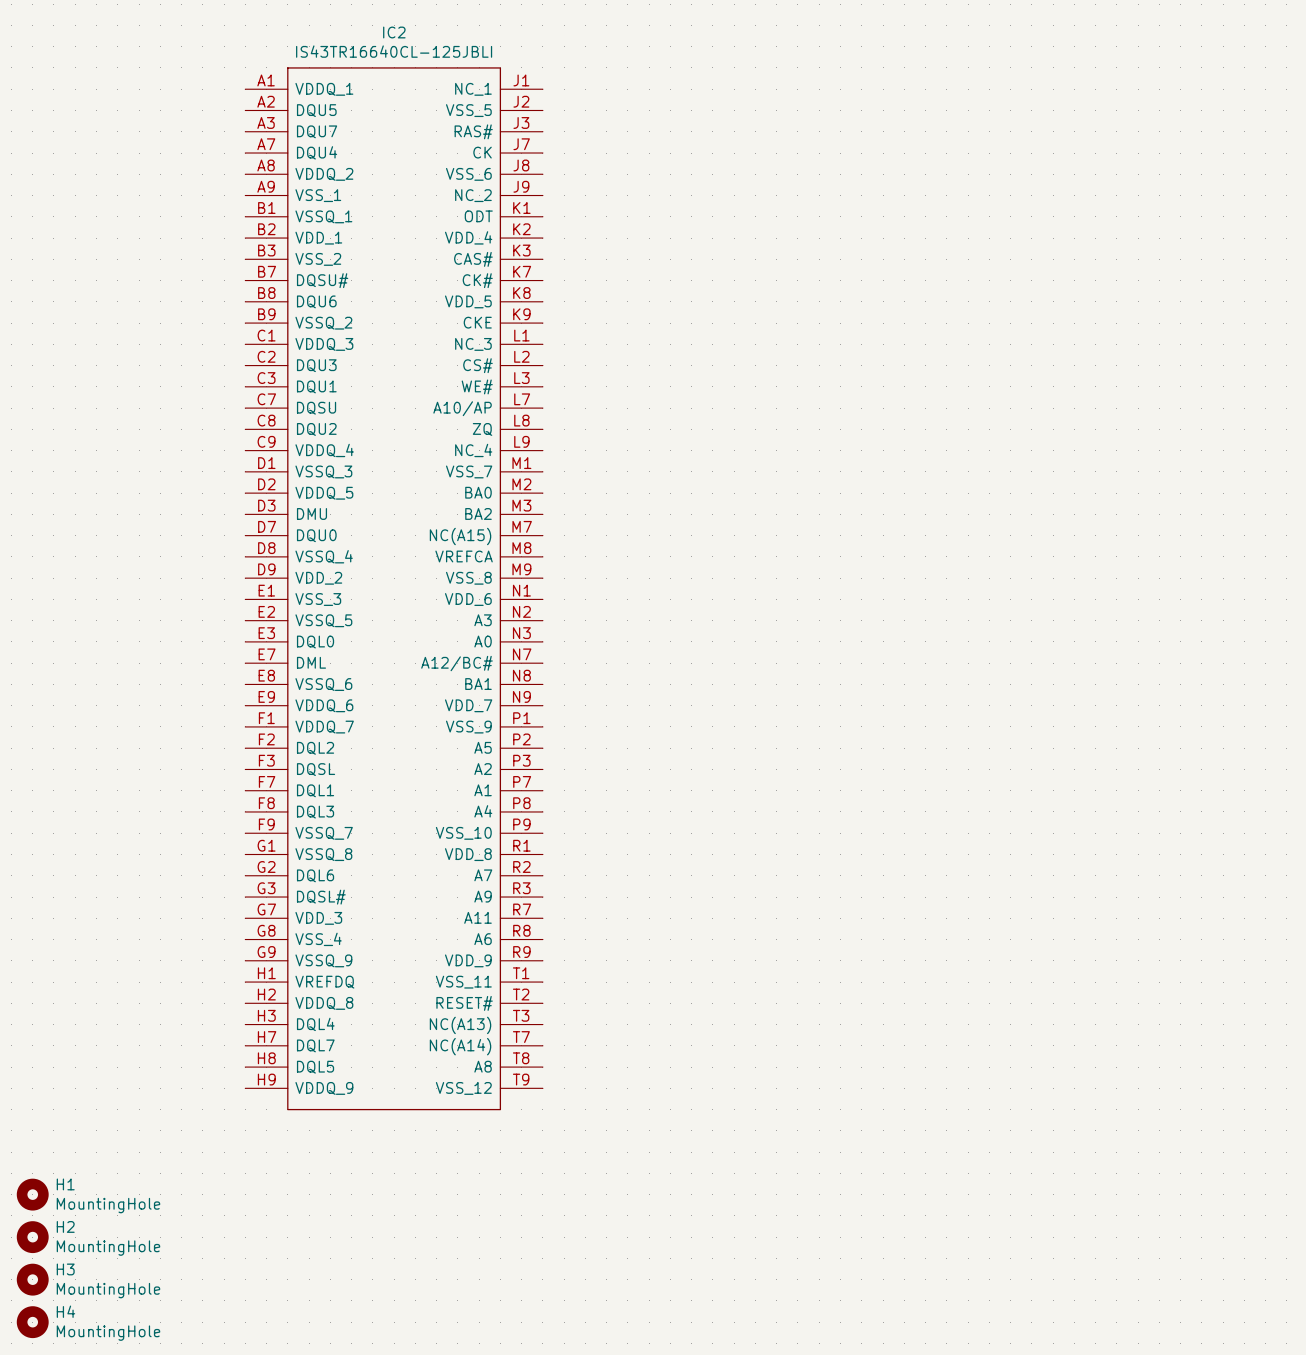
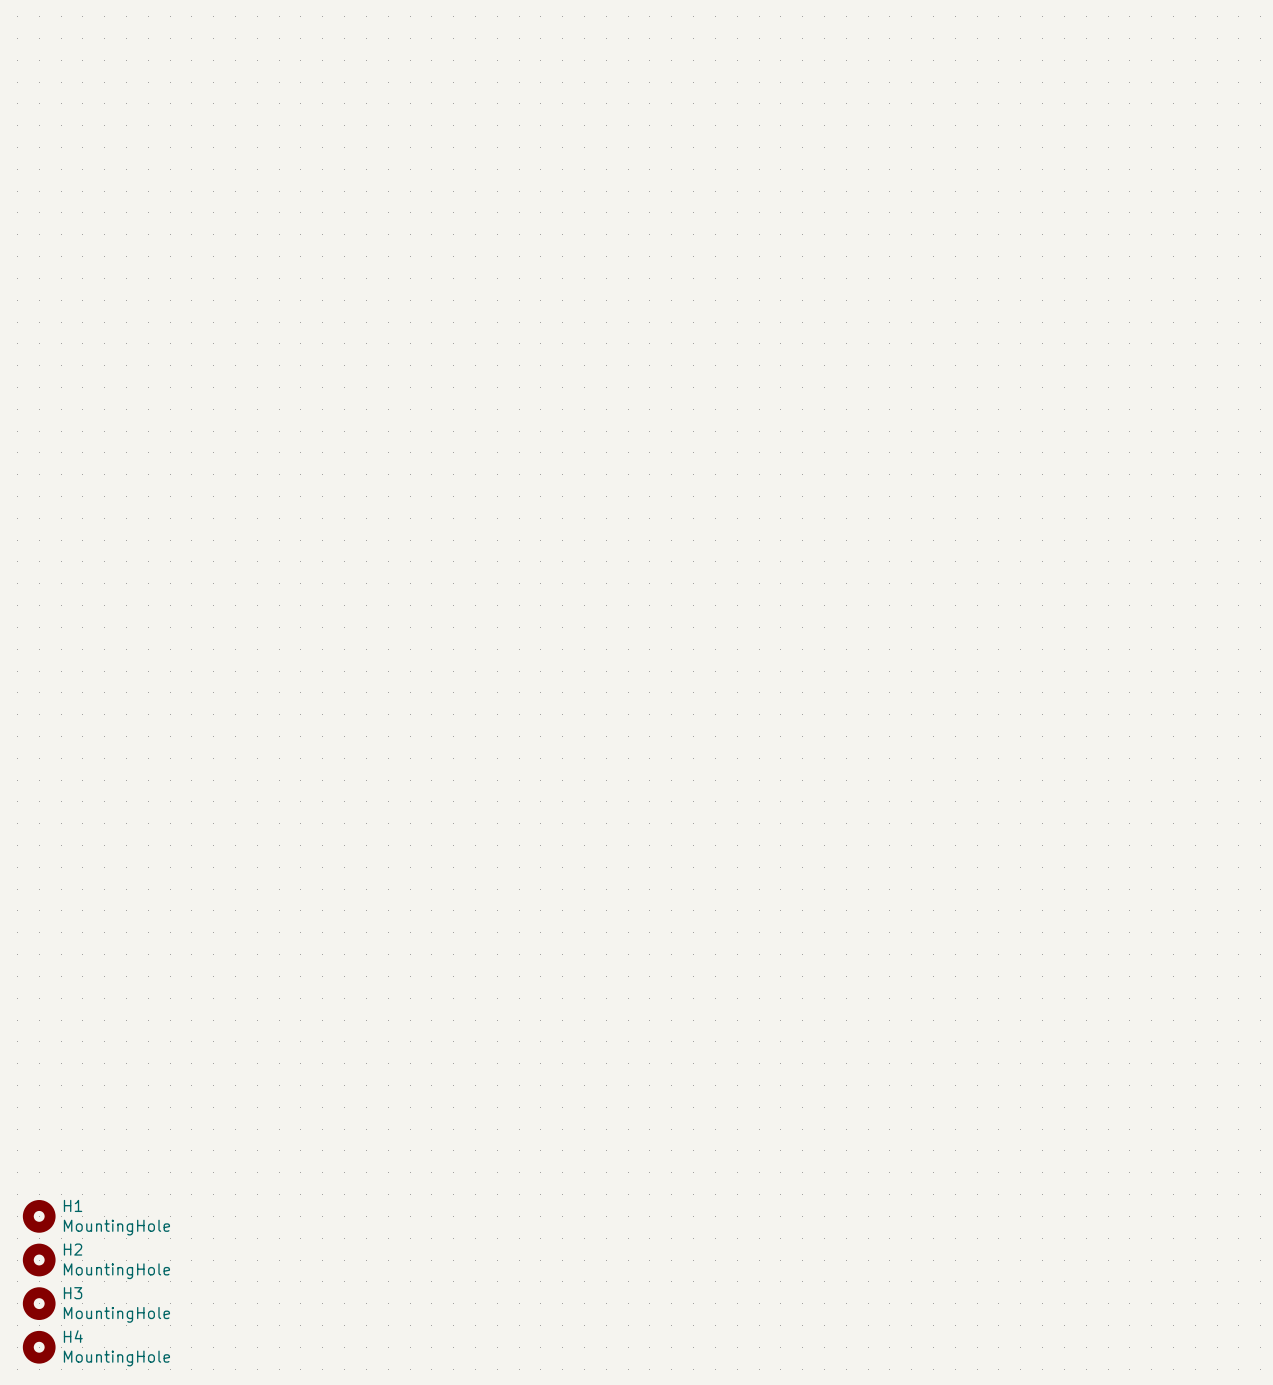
IC2: IS43TR16640CL-125JBLI (394, 588) -> none

